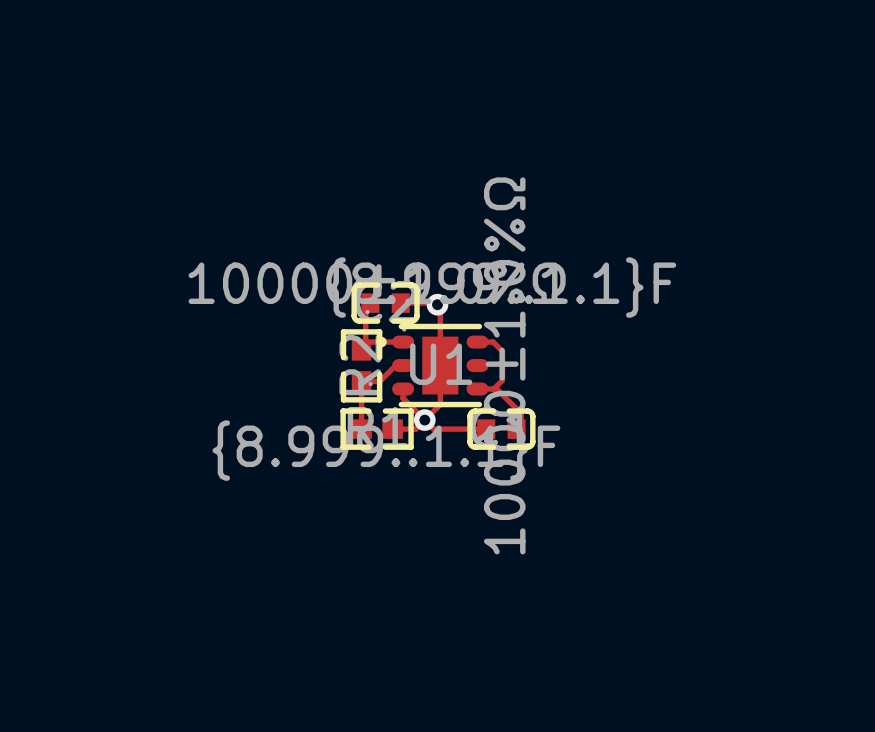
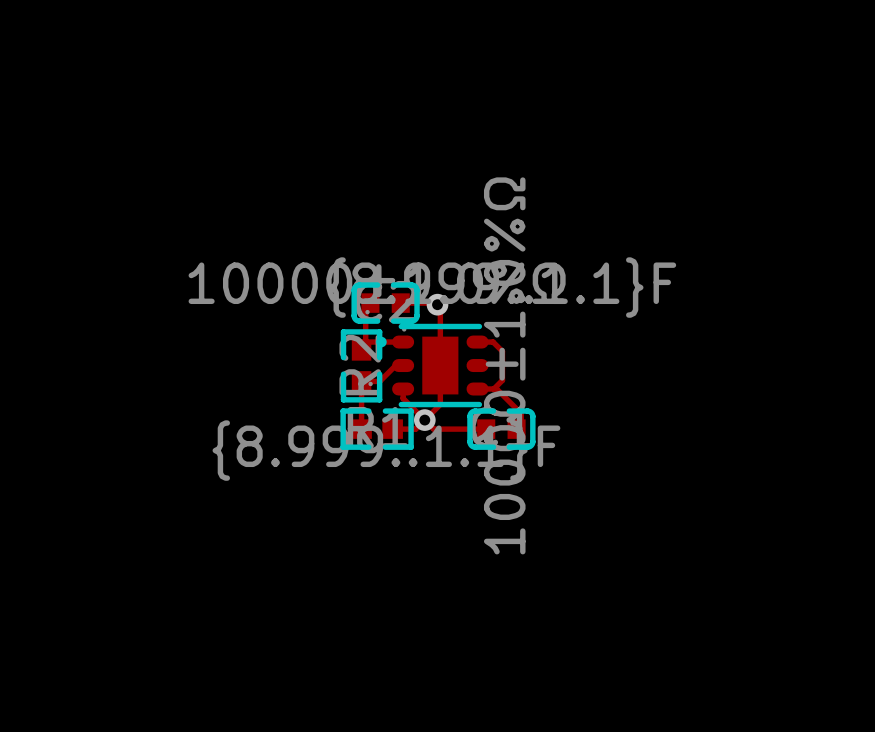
U1 name: U1 (441, 364) -> none

